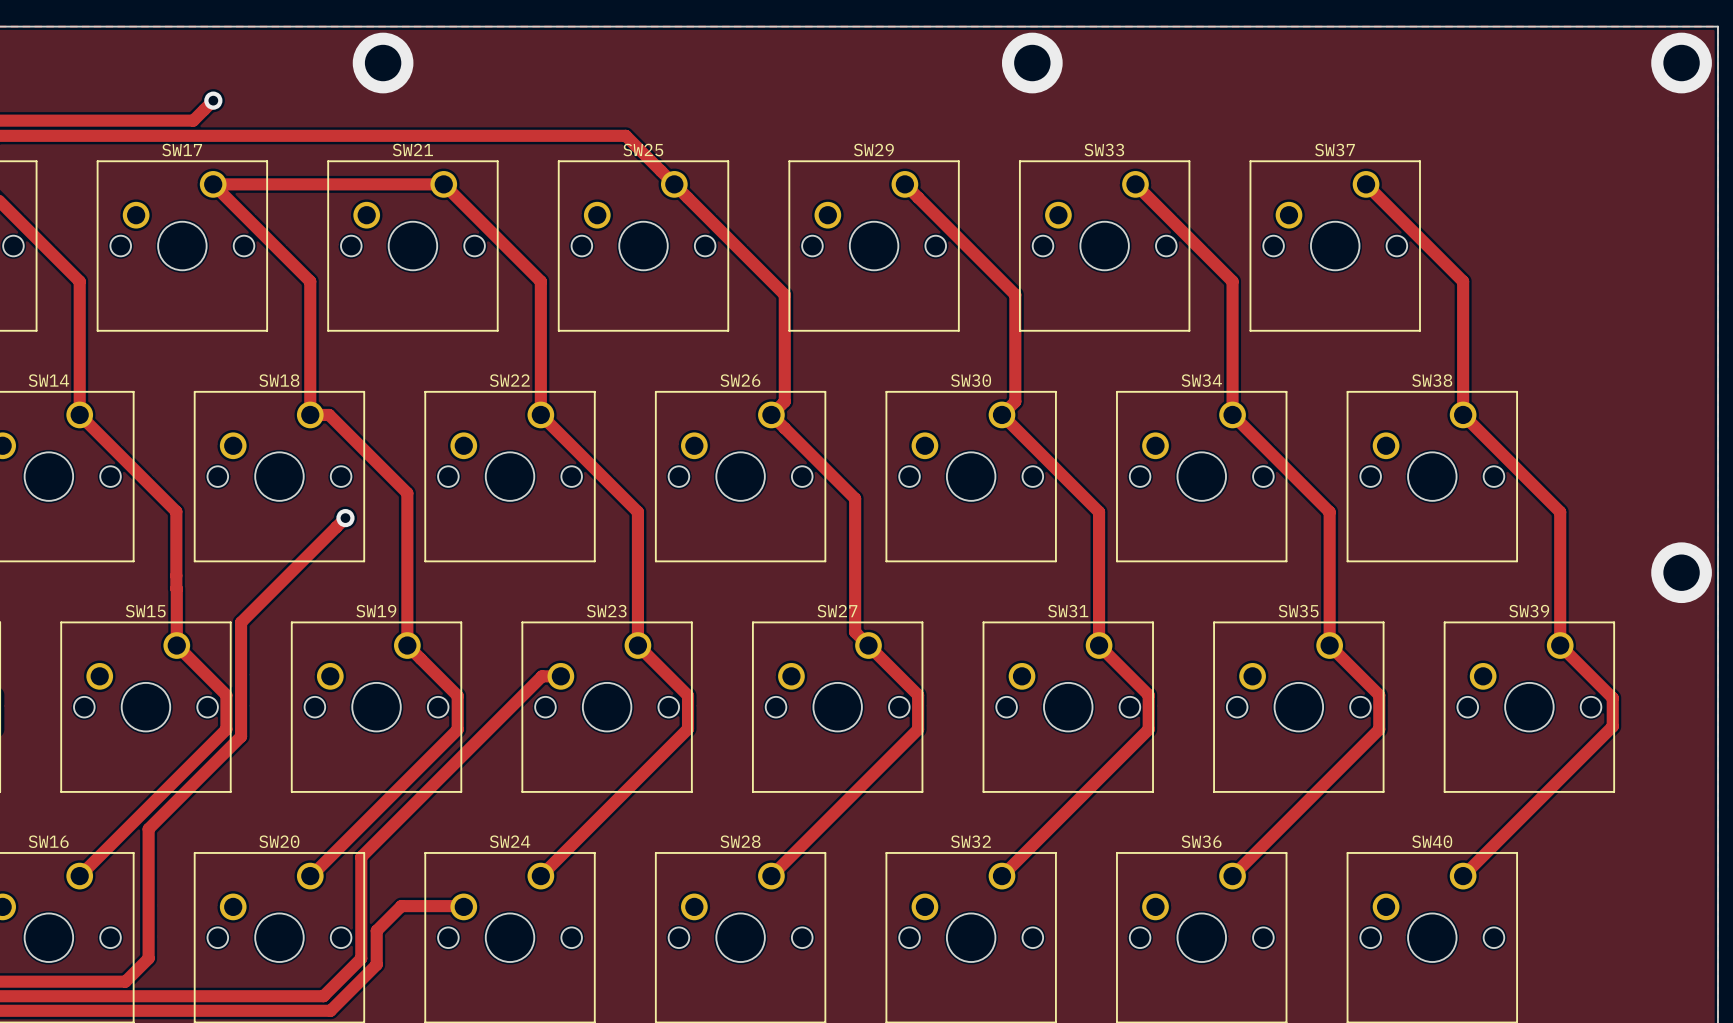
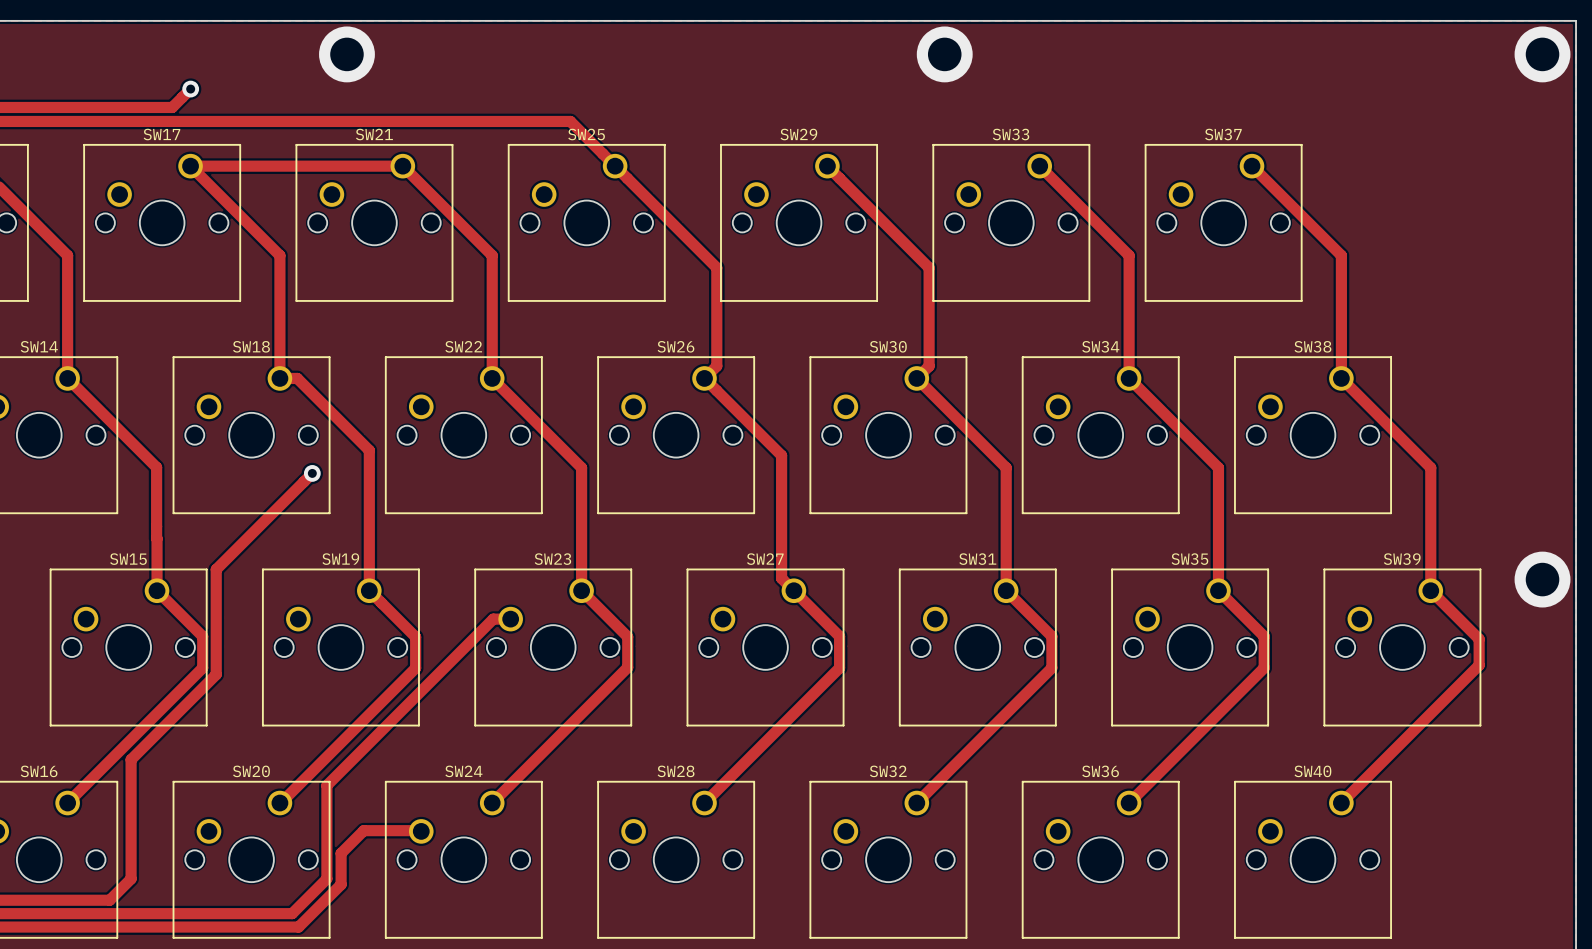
via position: (1681, 572) -> (1542, 579)

